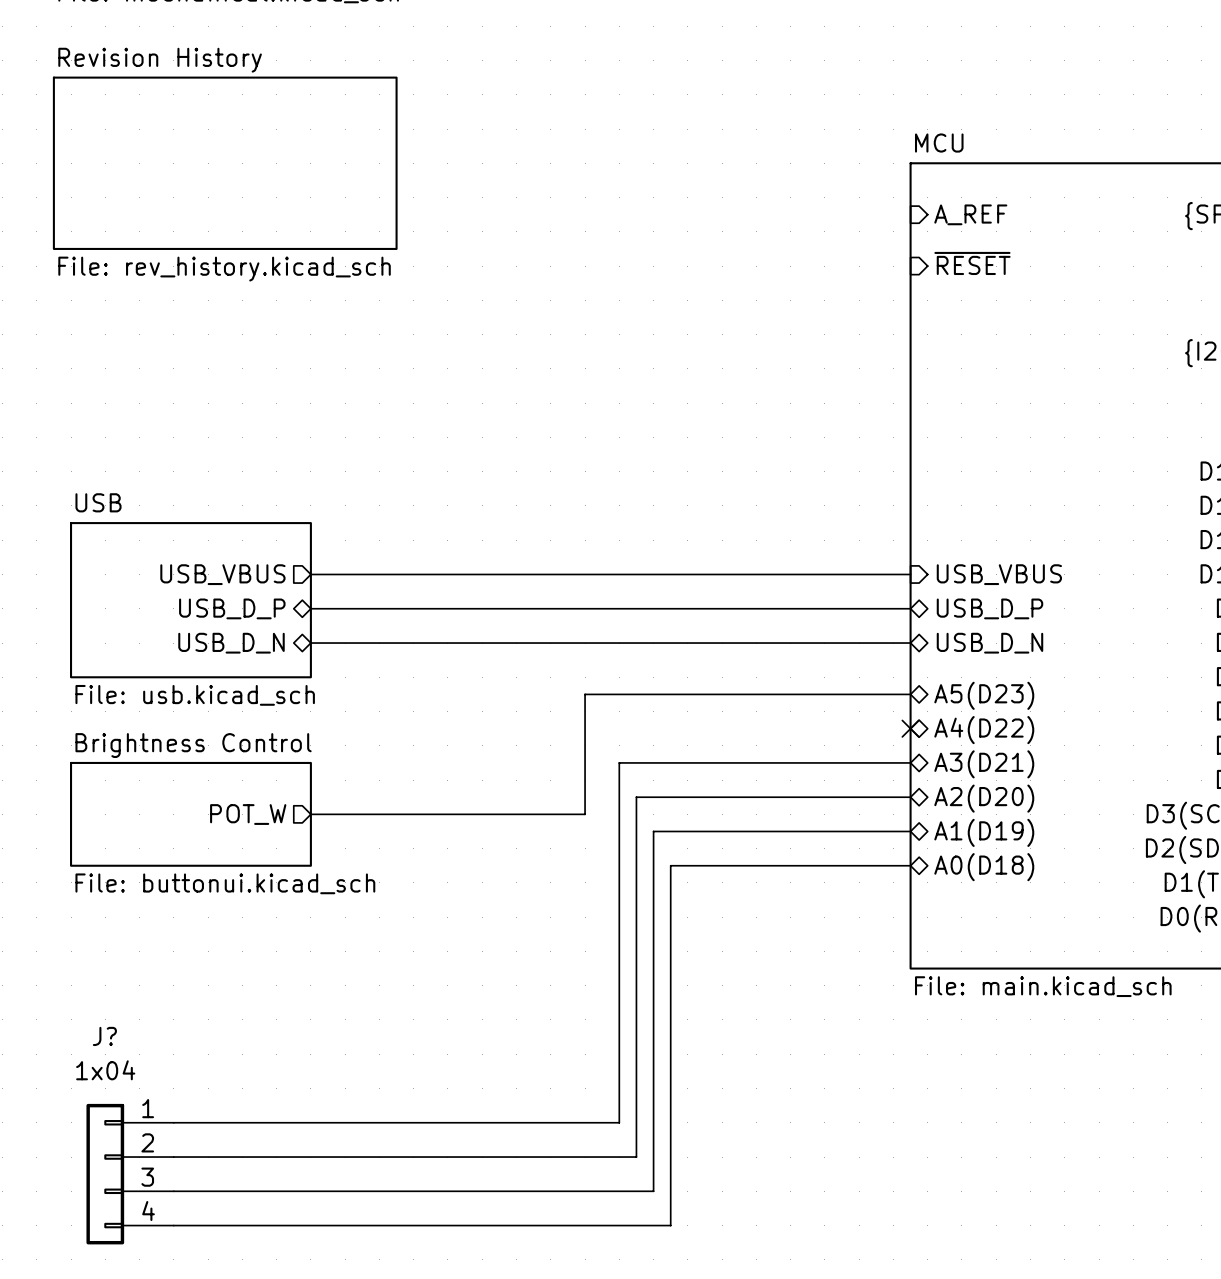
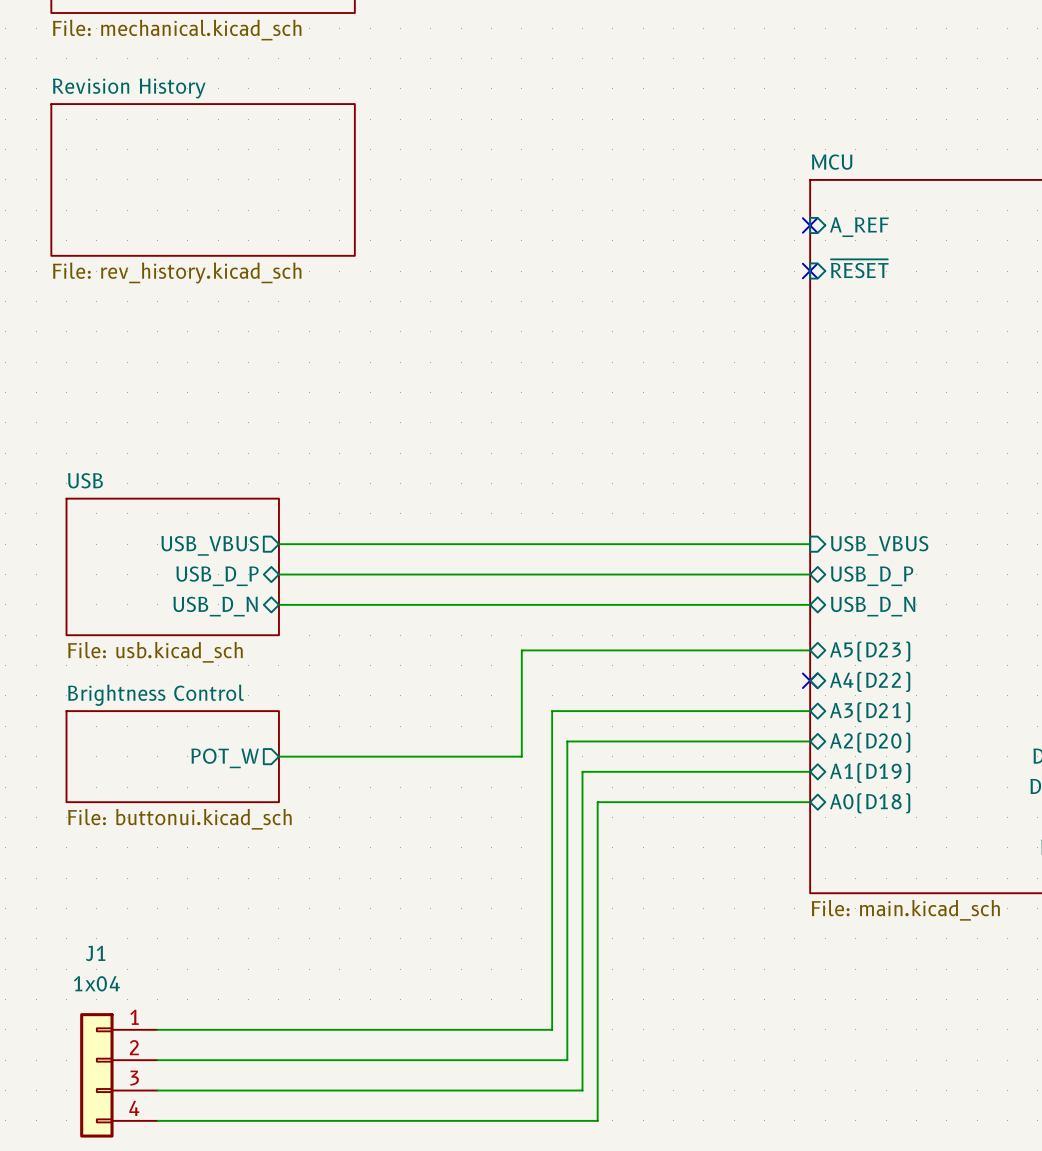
no-connect mark: none -> (810, 225)
no-connect mark: none -> (810, 271)
J? name: J? (104, 1036) -> J1 (95, 953)

